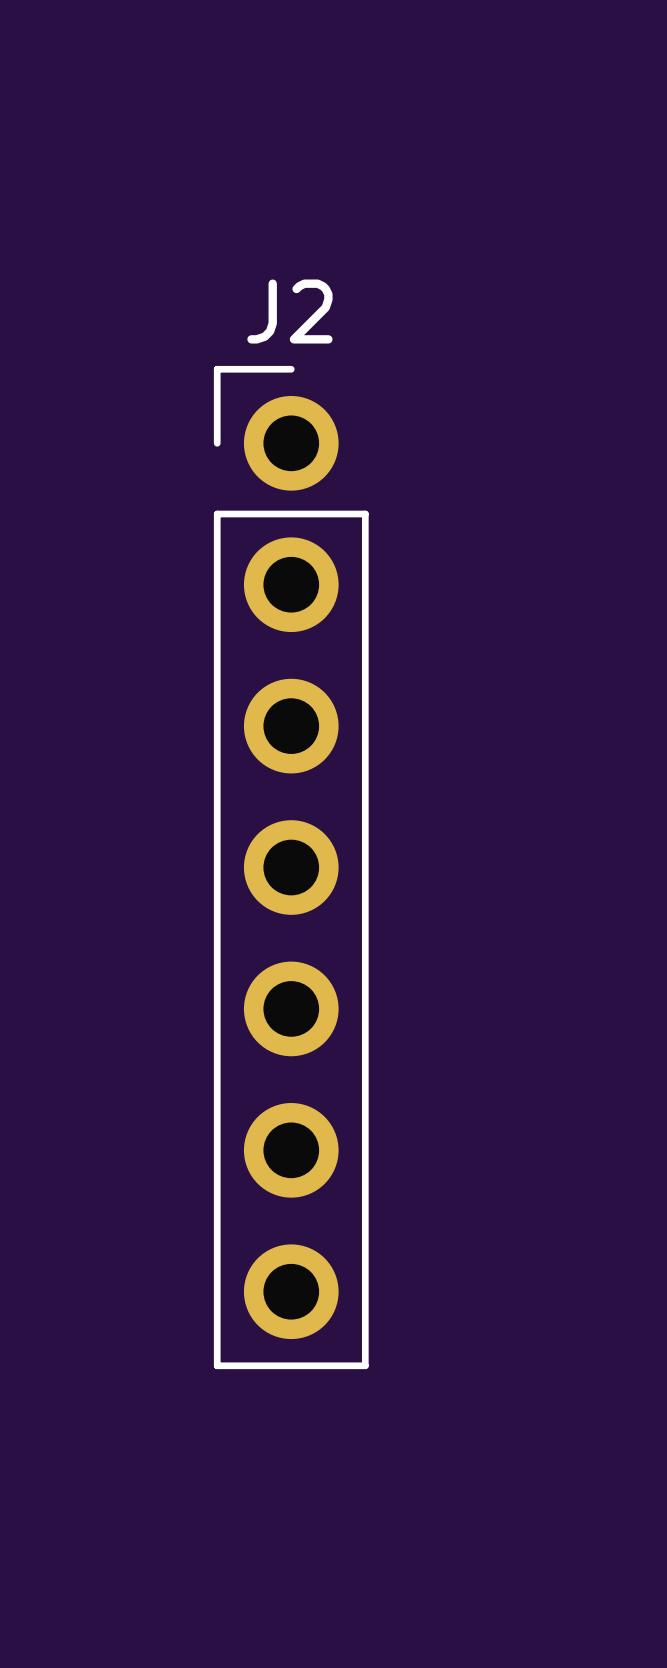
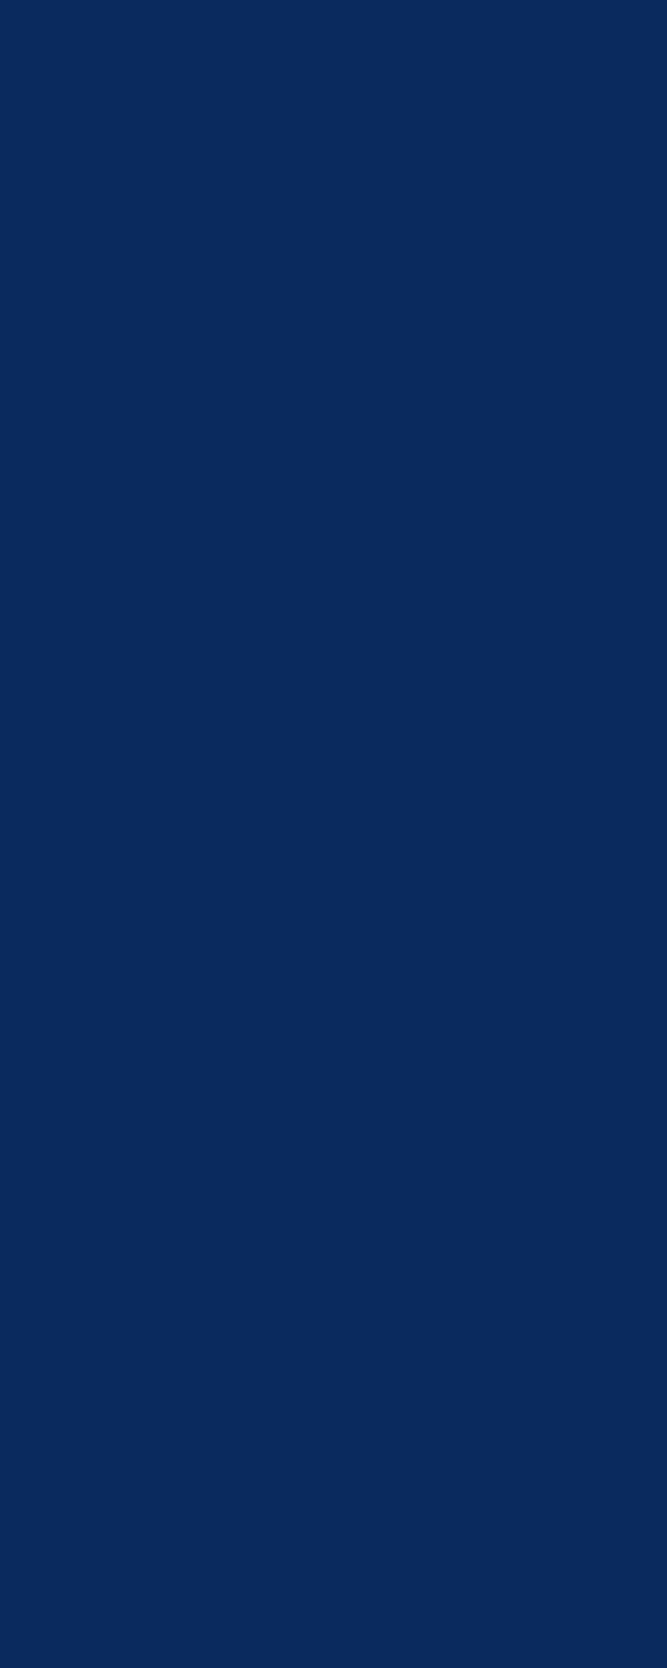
J2: (291, 867) -> none

